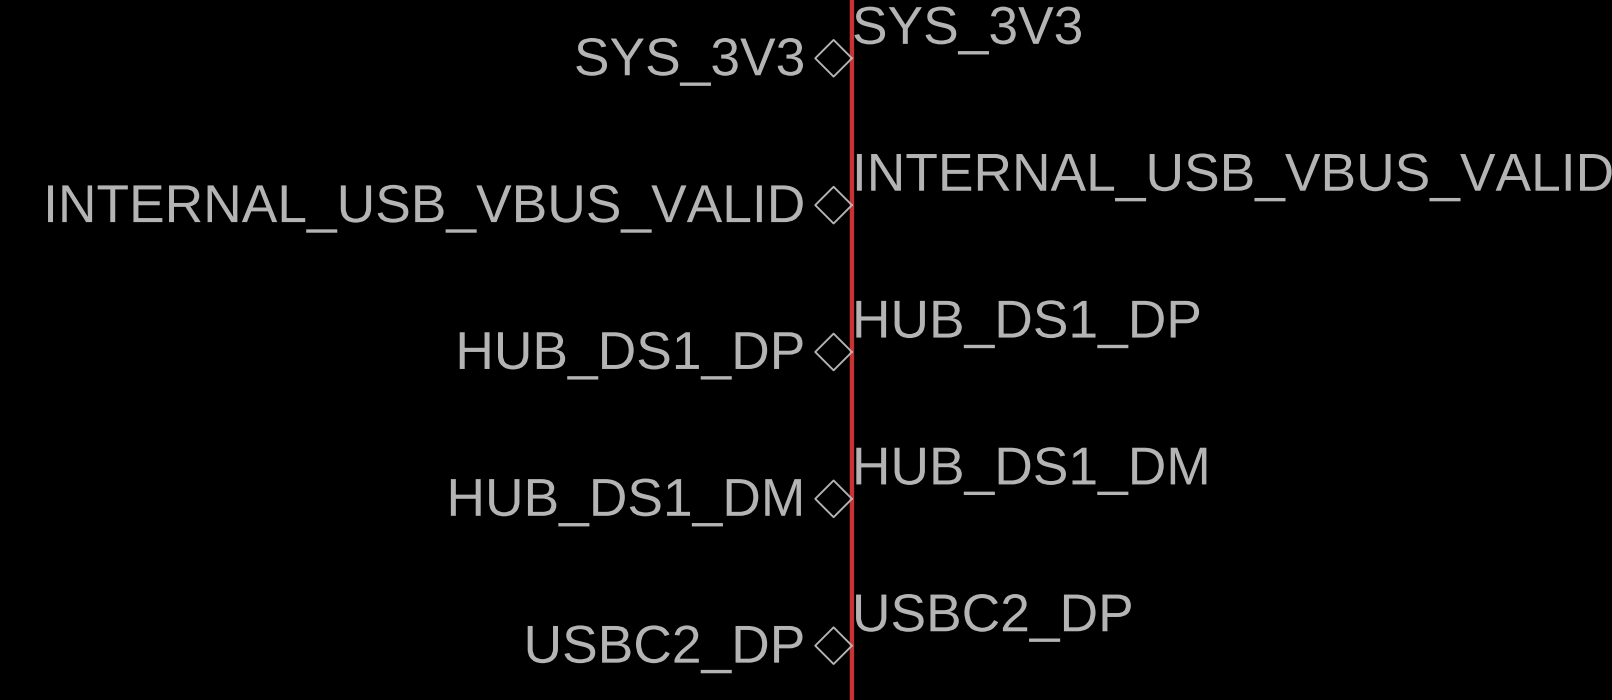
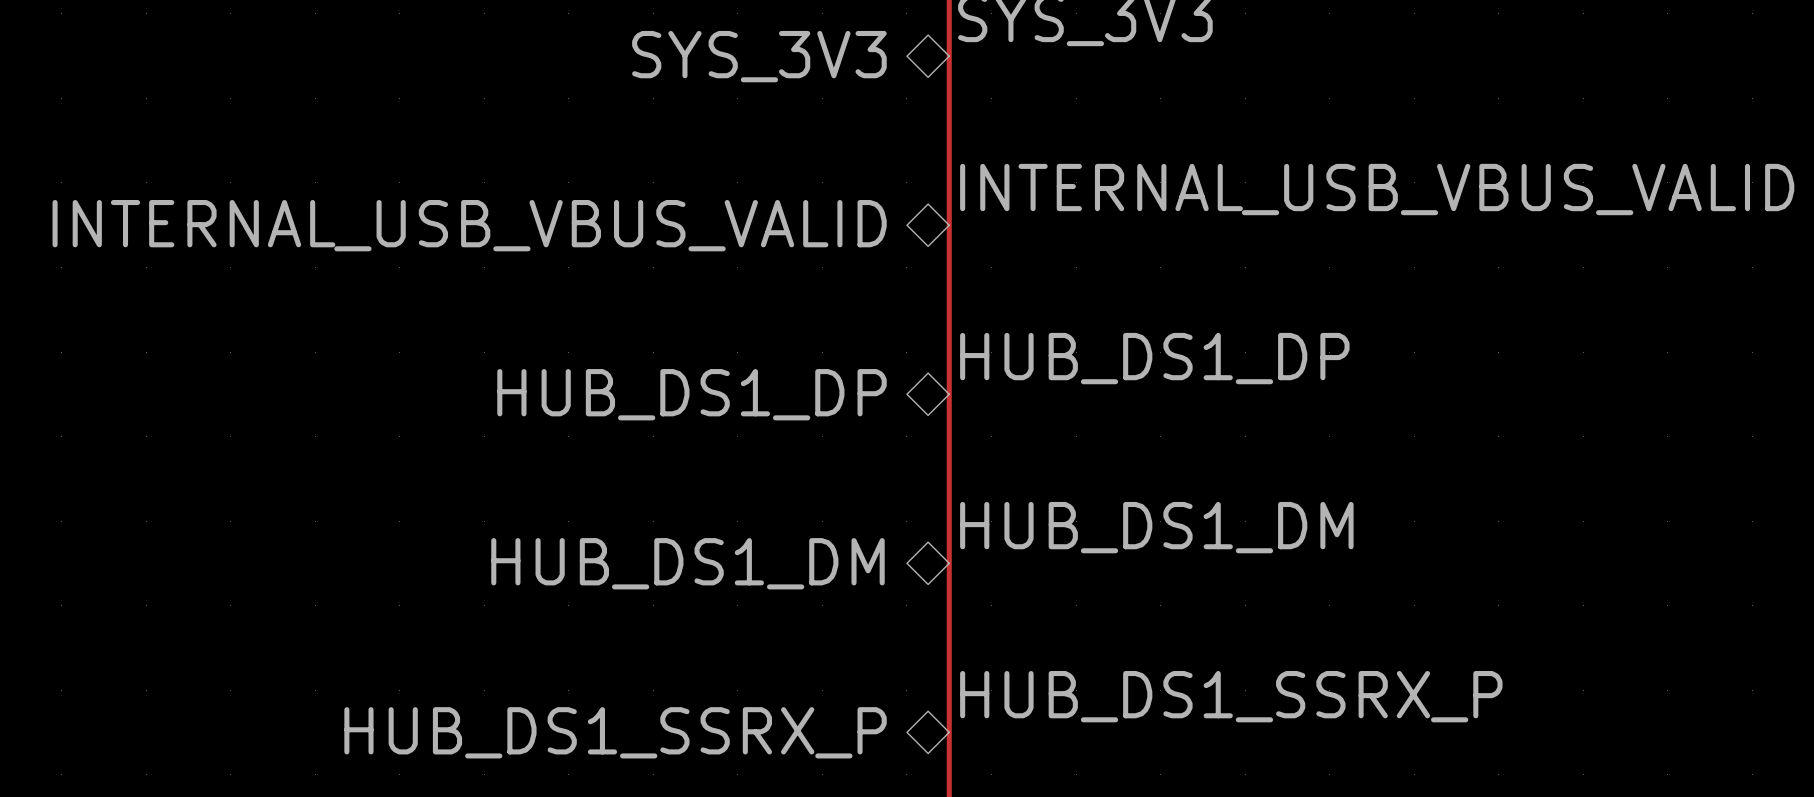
label: USBC2_DP (993, 617) -> HUB_DS1_SSRX_P (1231, 696)
sheet pin: USBC2_DP (665, 649) -> HUB_DS1_SSRX_P (615, 732)

